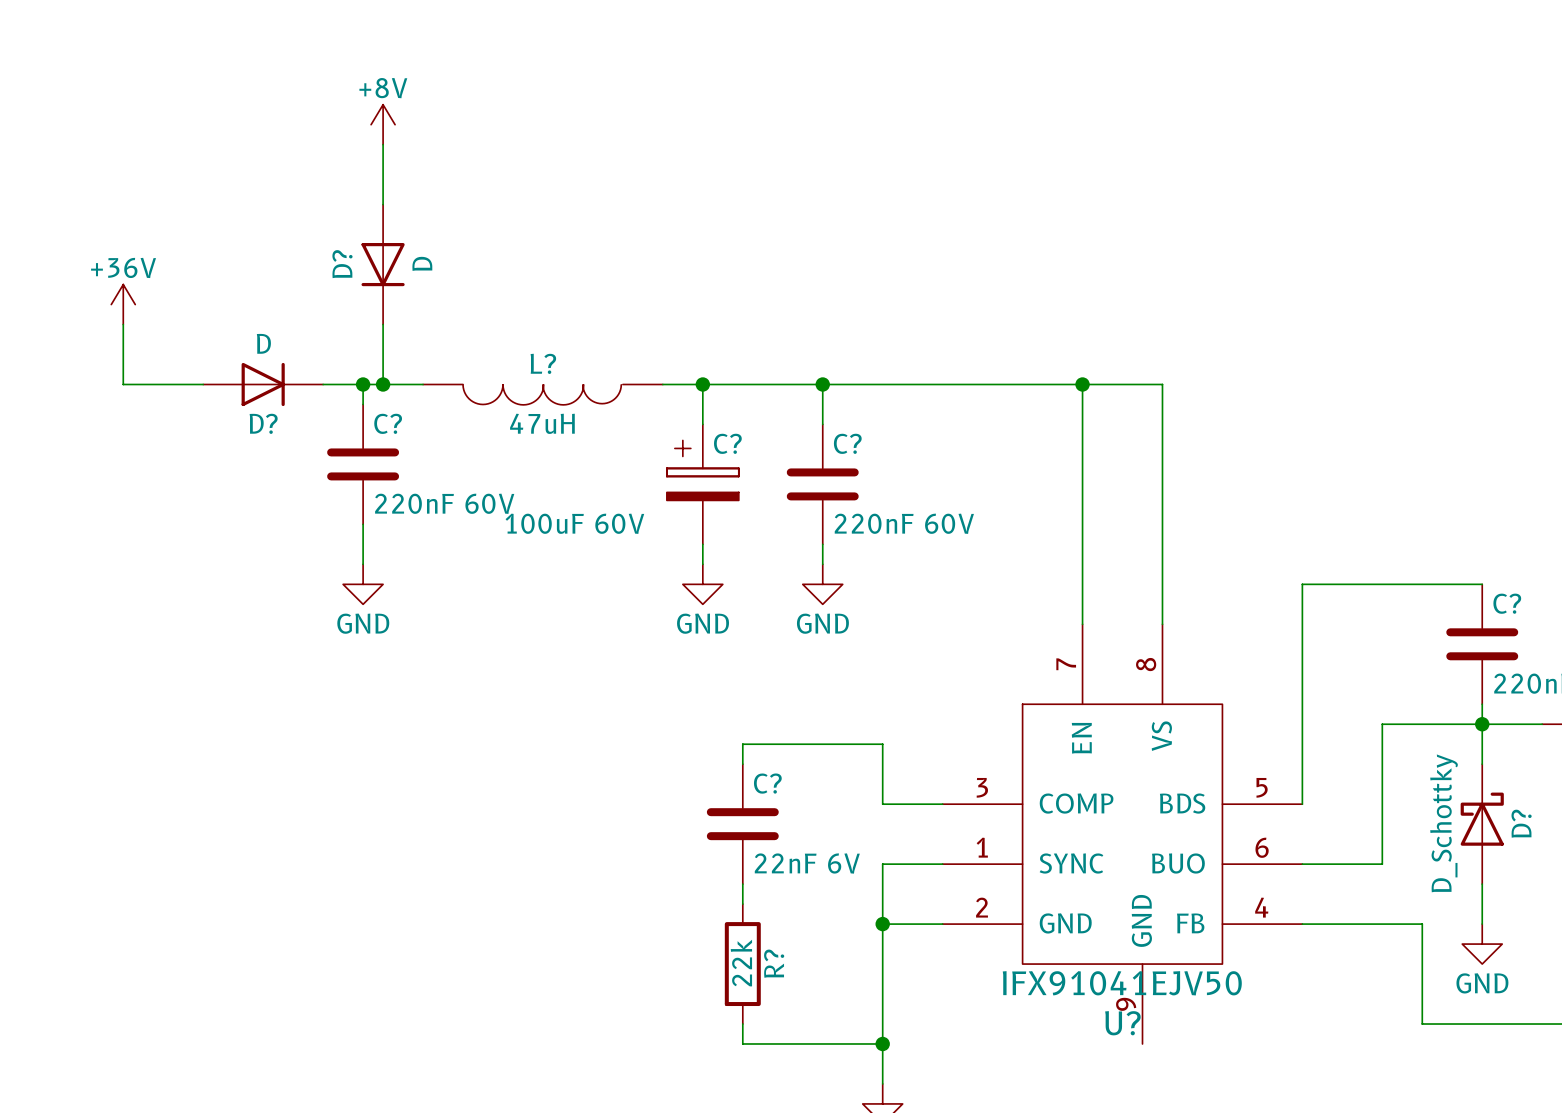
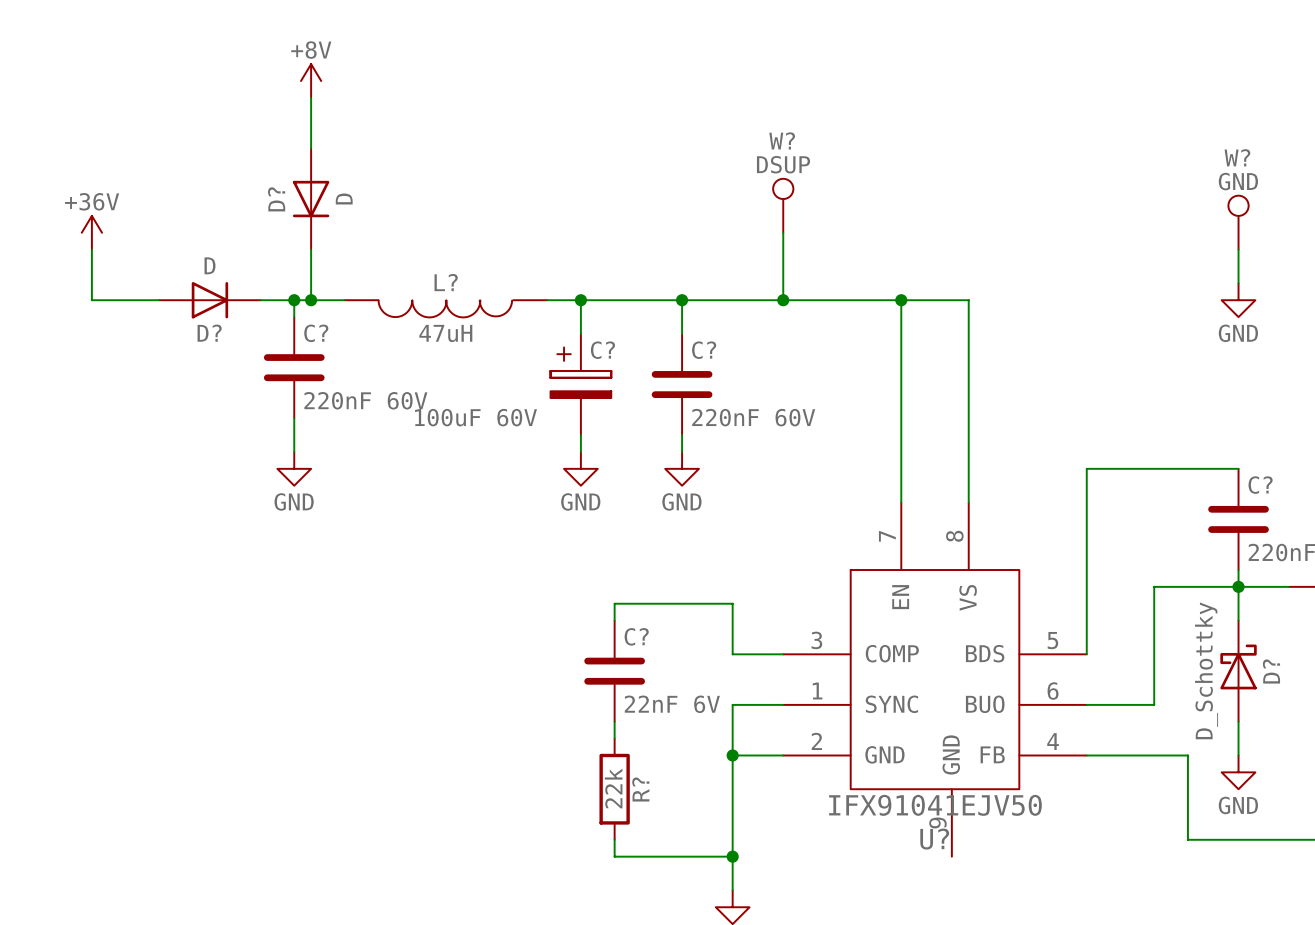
W?: none -> DSUP (783, 205)
W?: none -> GND (1238, 222)
wire: none -> (783, 232) (783, 300)
wire: none -> (1238, 249) (1238, 283)
junction: none -> (783, 300)
power symbol: none -> GND (1238, 300)

